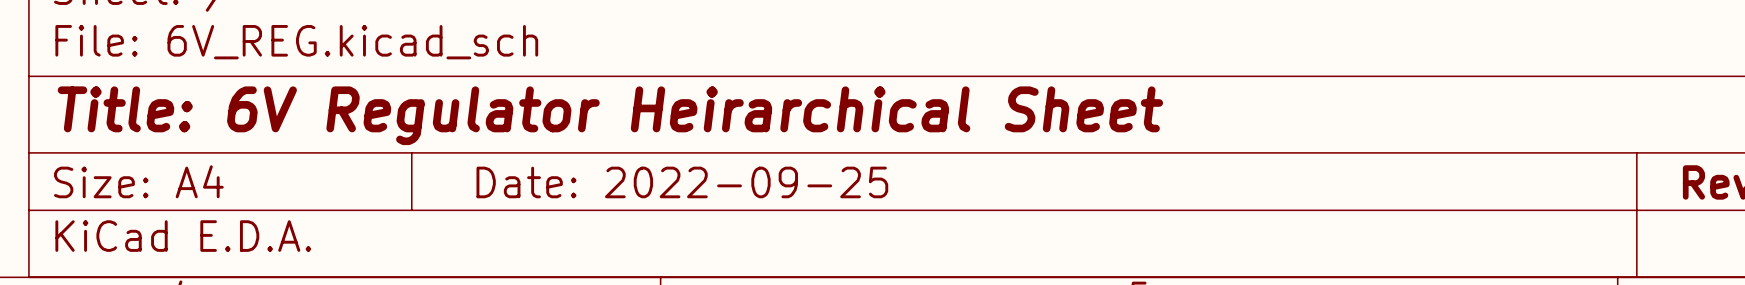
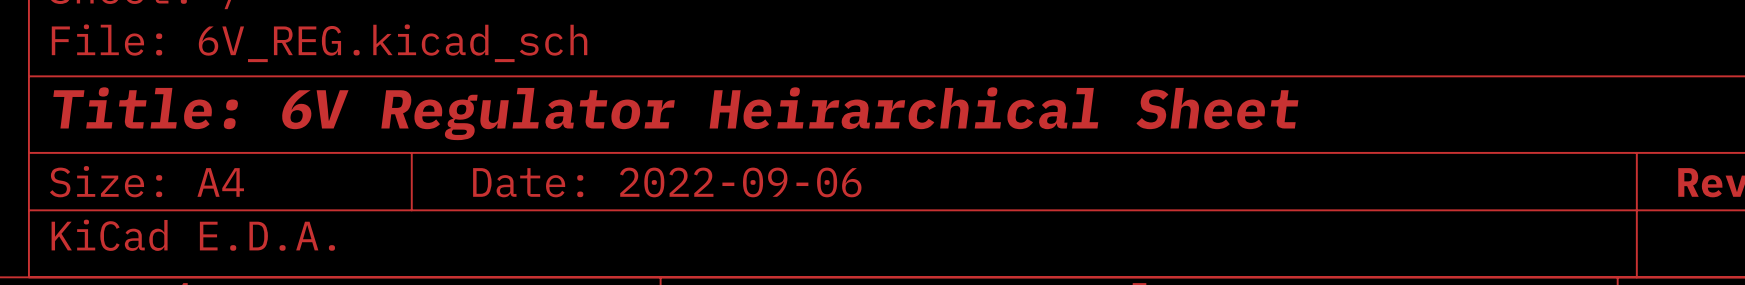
title block: Date: 2022-09-25 (682, 182) -> Date: 2022-09-06 (667, 182)

